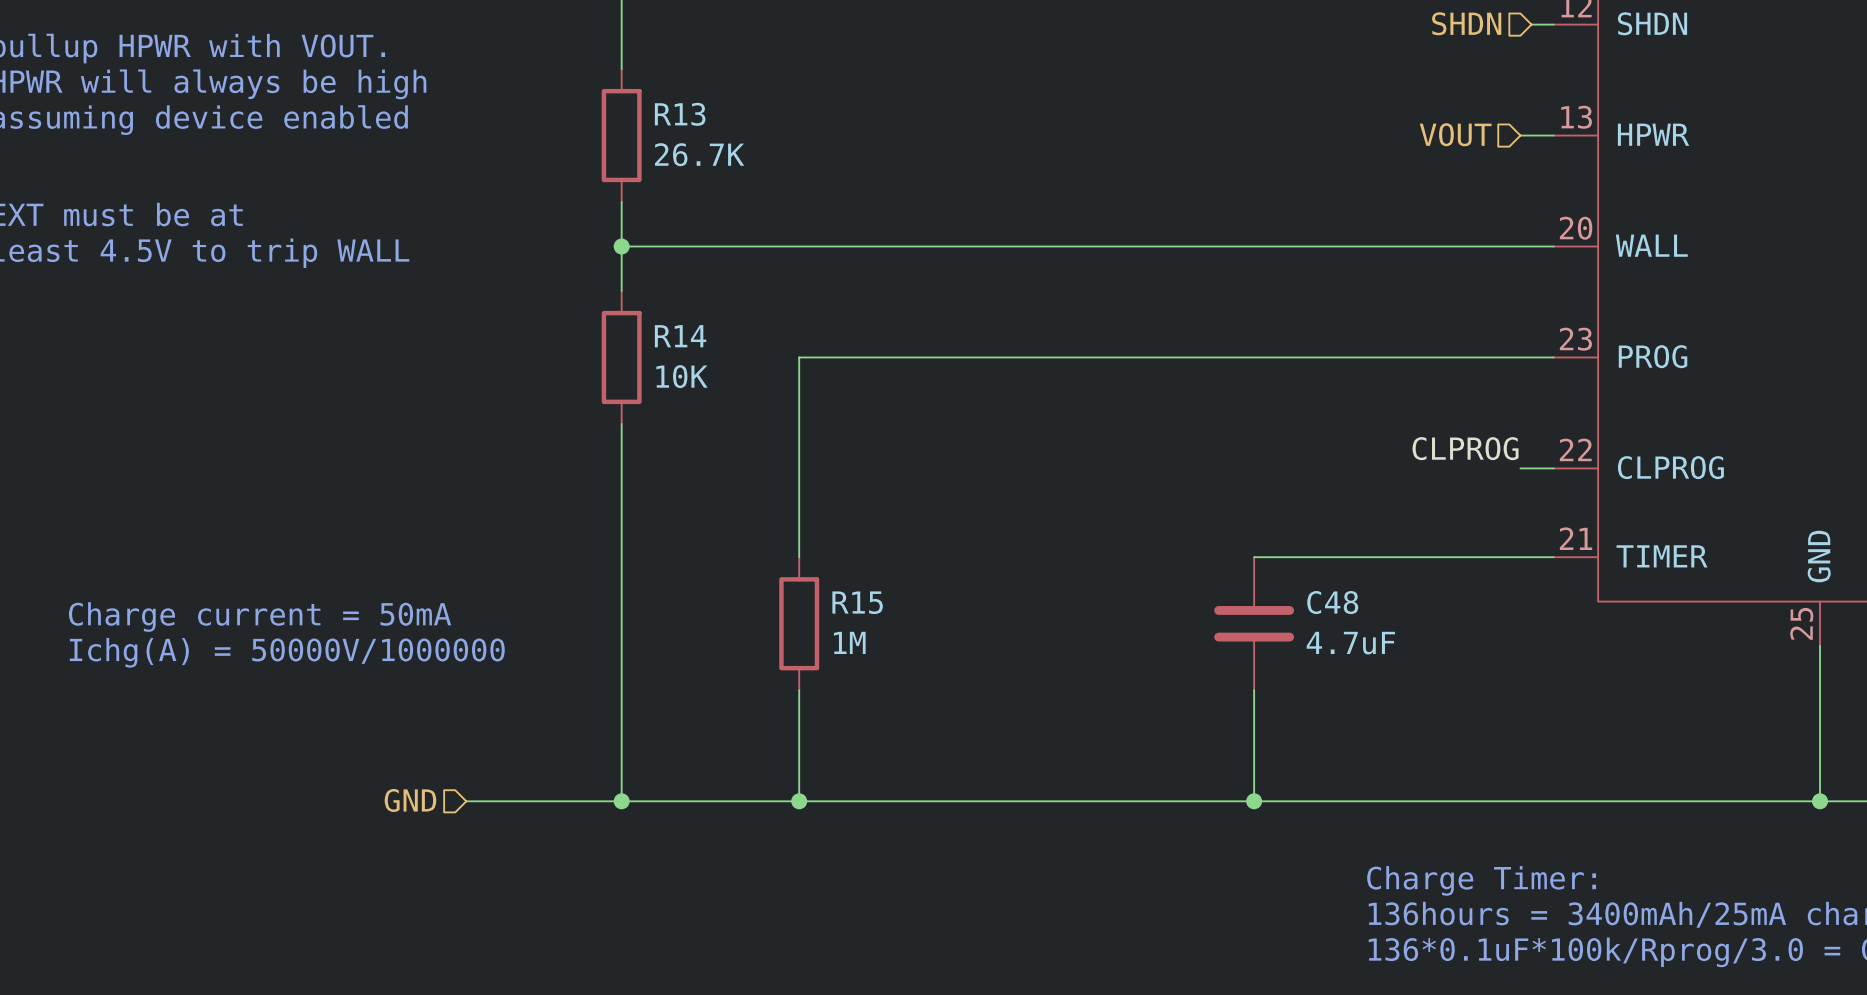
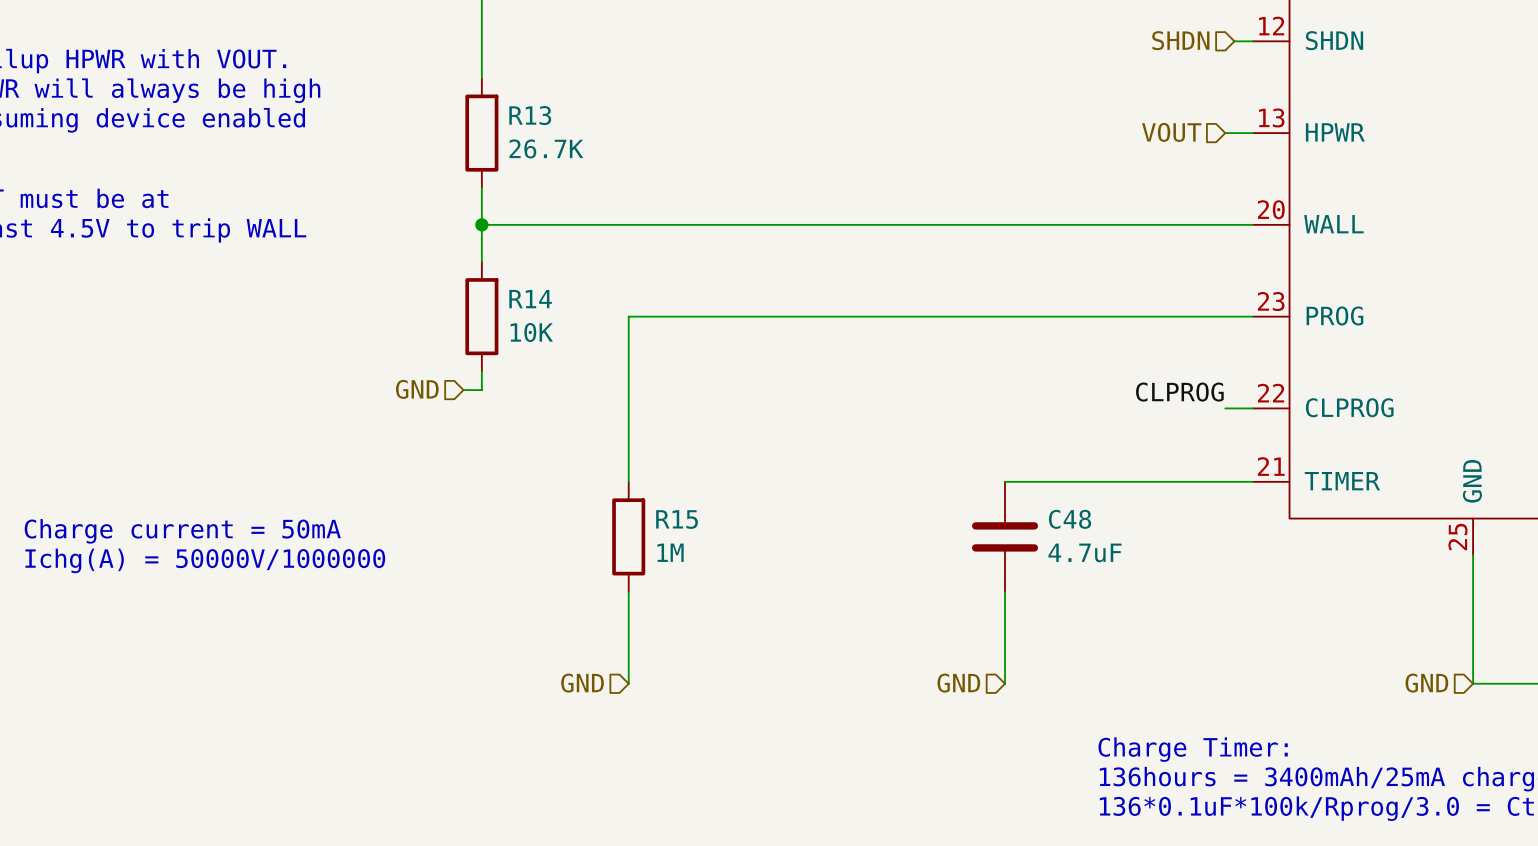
hierarchical label: none -> GND (417, 389)
wire: (621, 446) (621, 801) -> (481, 390) (463, 390)
hierarchical label: GND (410, 800) -> none
hierarchical label: none -> GND (582, 683)
hierarchical label: none -> GND (958, 683)
hierarchical label: none -> GND (1426, 683)
wire: (466, 801) (1820, 801) -> none
junction: (621, 801) -> none
junction: (799, 801) -> none
junction: (1254, 801) -> none
junction: (1820, 801) -> none

